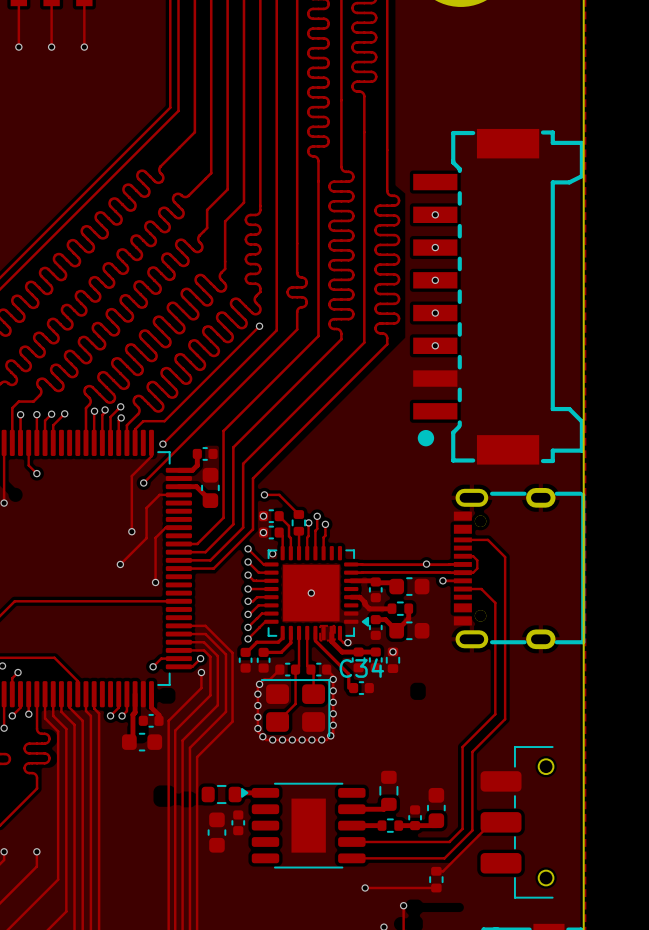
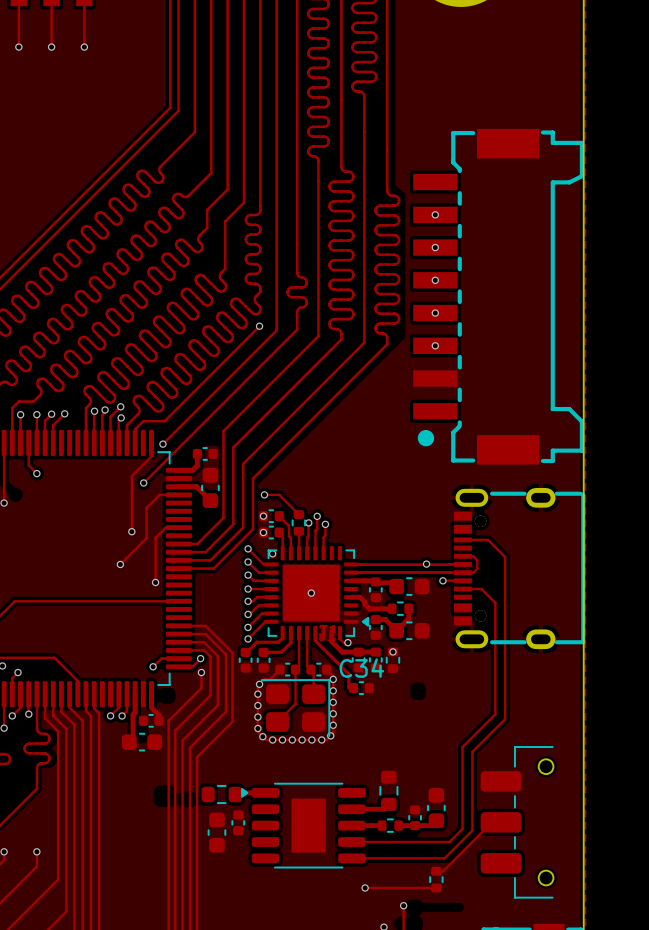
track: (41, 763) (28, 763) (24, 766) (26, 771) (34, 773) (37, 778) -> (41, 763) (37, 766) (37, 778)

